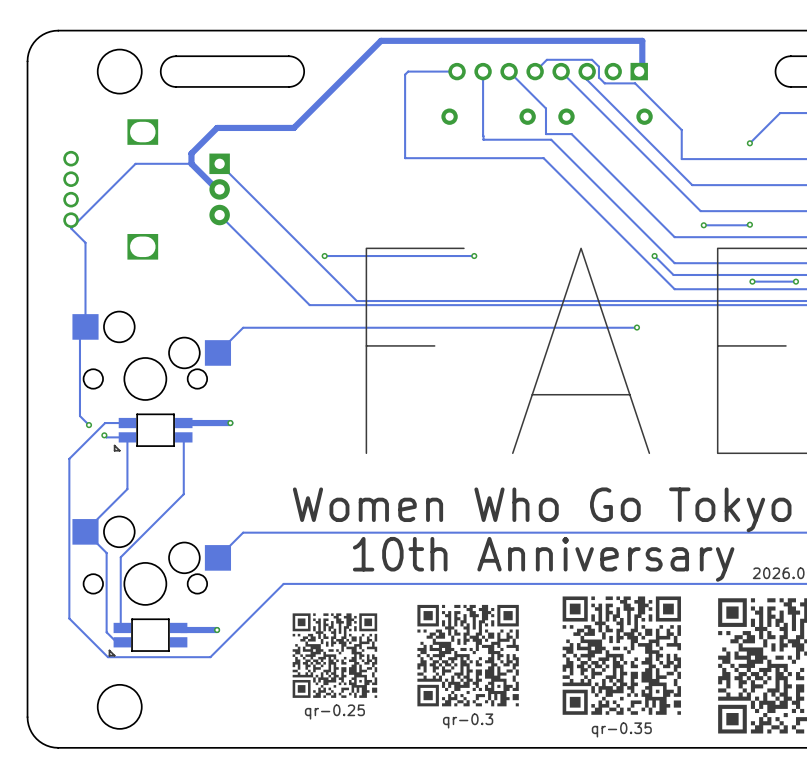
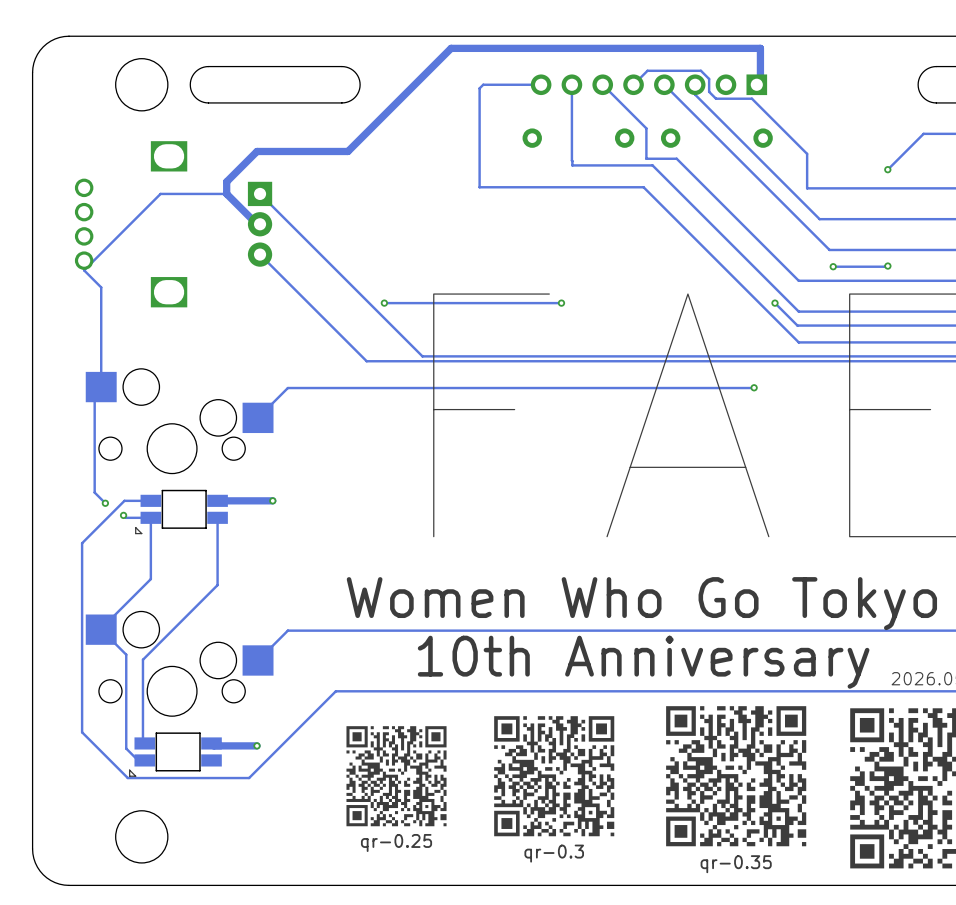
via: (752, 281) -> none
track: (795, 281) (752, 281) -> none
via: (795, 281) -> none

